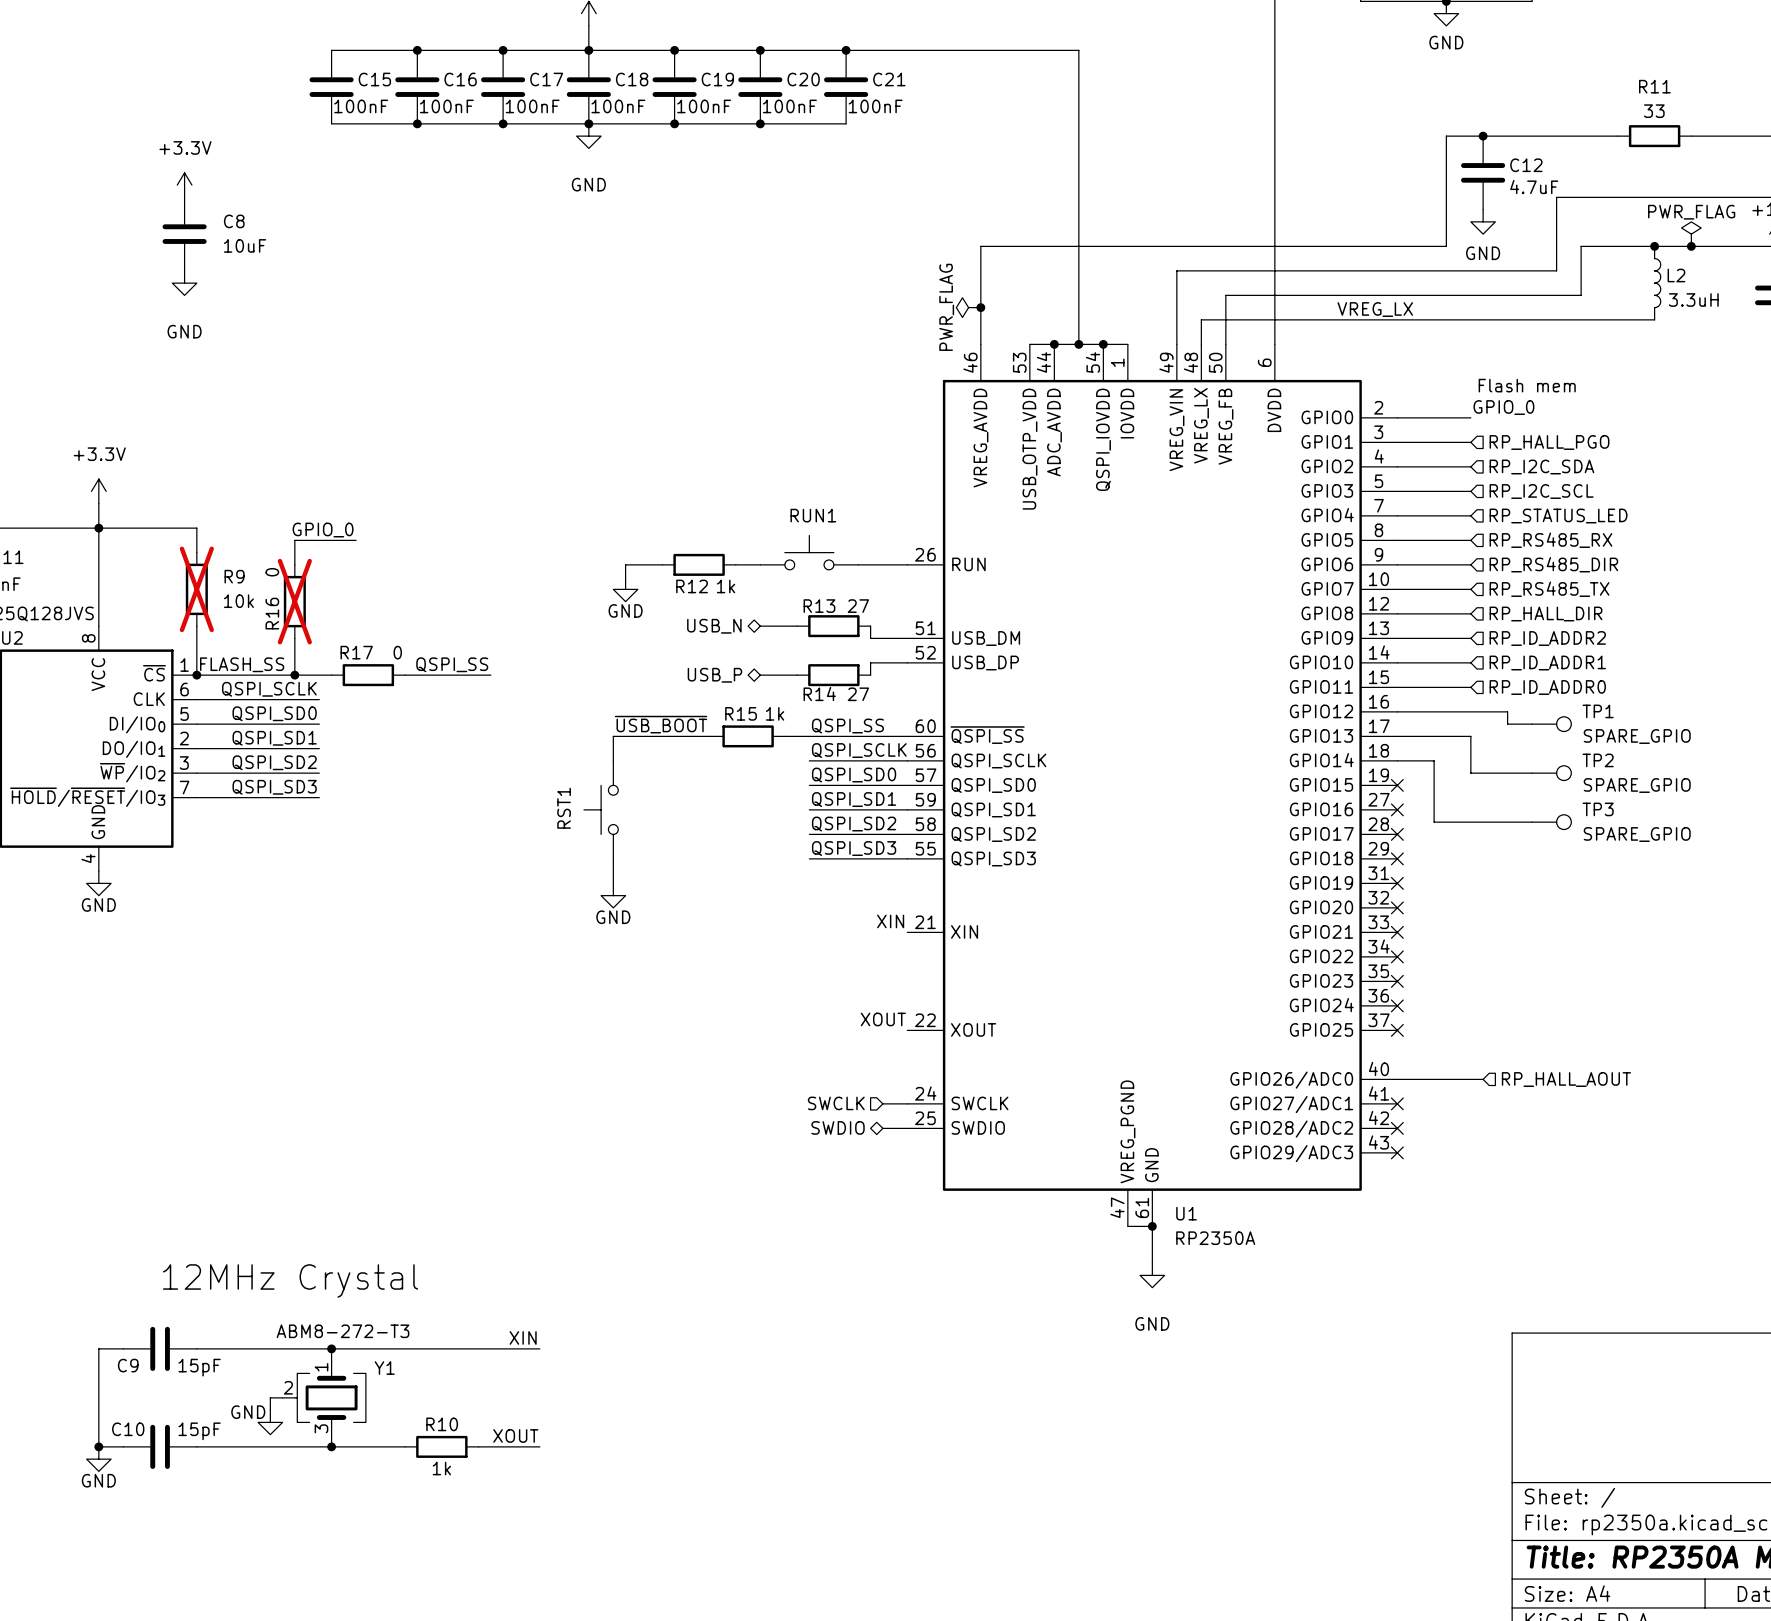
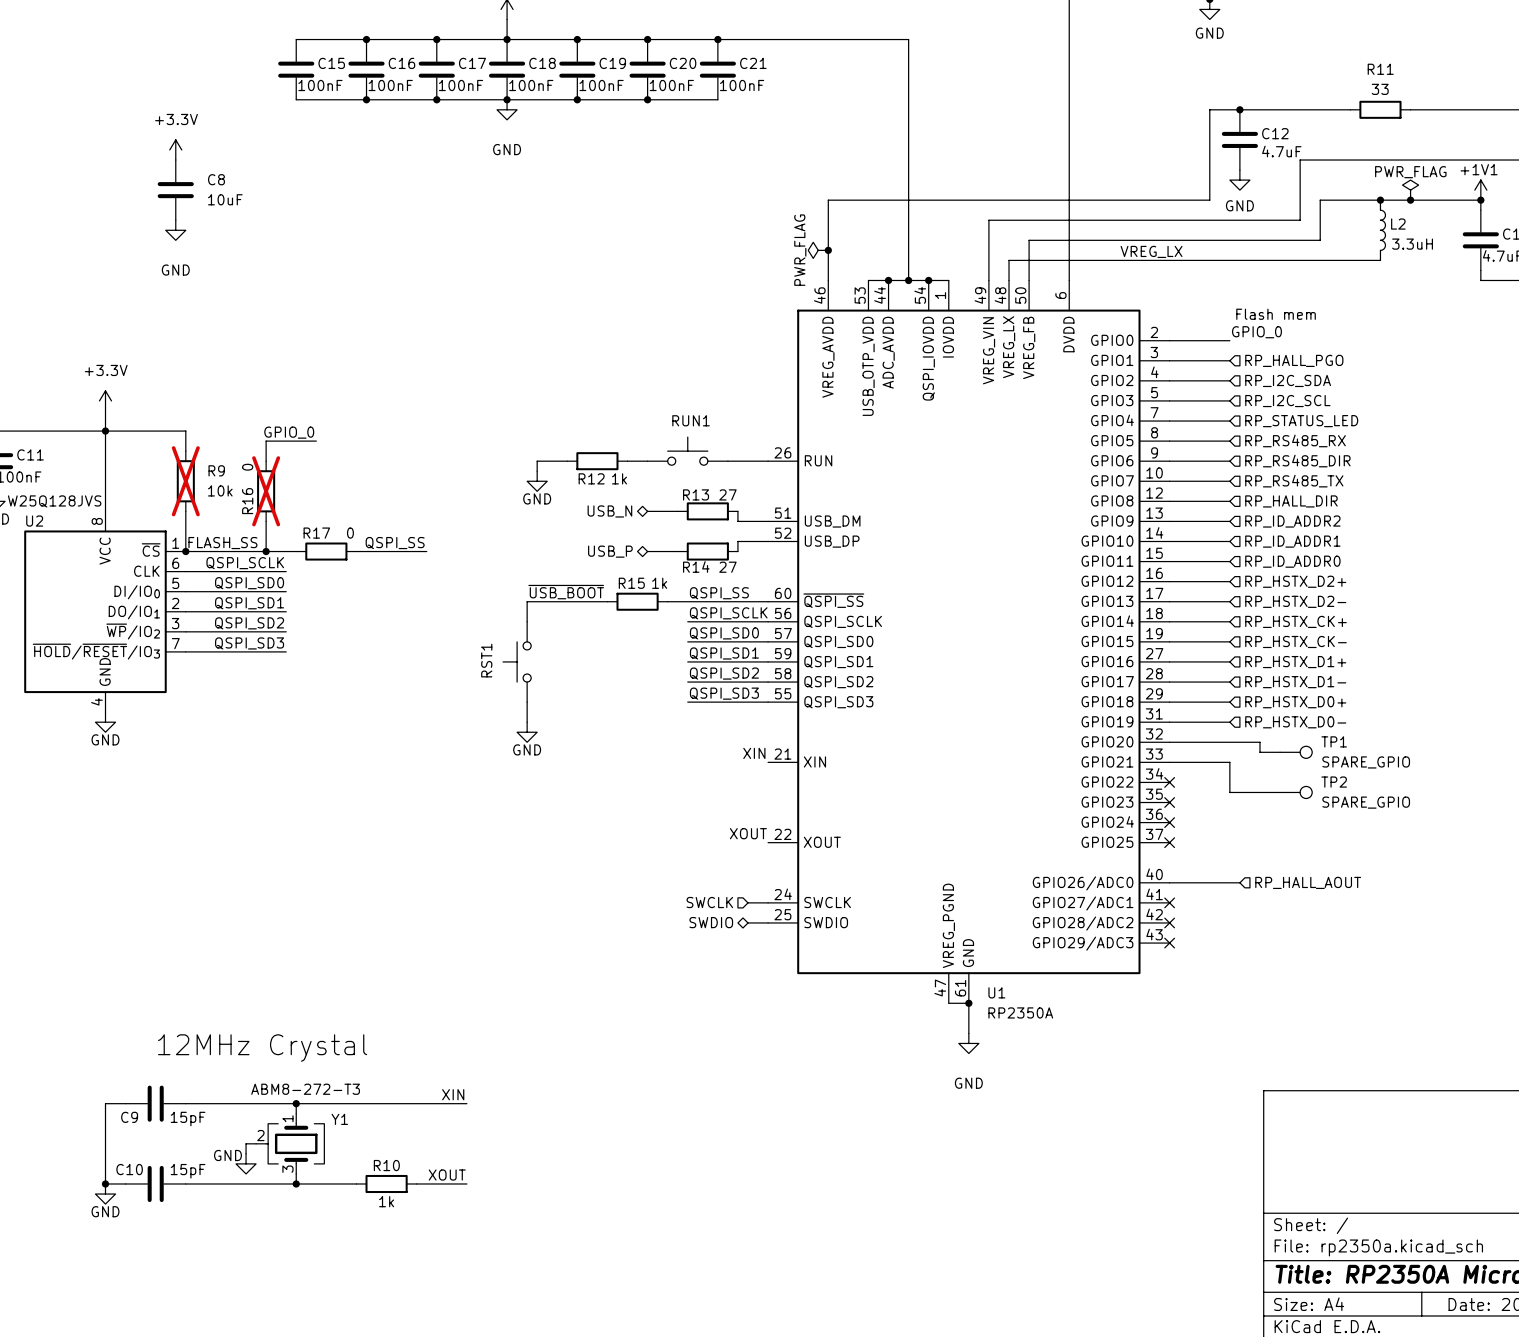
wire: (1470, 711) (1507, 711) (1507, 724) (1532, 724) -> none
hierarchical label: none -> RP_HSTX_D2+ (1295, 581)
TP1 position: (1551, 724) -> (1296, 752)
wire: (1470, 736) (1470, 773) (1532, 773) -> none
hierarchical label: none -> RP_HSTX_D2- (1295, 601)
wire: (1434, 760) (1434, 822) (1532, 822) -> (1199, 621) (1229, 621)
hierarchical label: none -> RP_HSTX_CK+ (1295, 621)
TP2 position: (1551, 773) -> (1296, 792)
wire: none -> (1169, 641) (1229, 641)
no-connect mark: (1397, 785) -> none
hierarchical label: none -> RP_HSTX_CK- (1295, 641)
wire: none -> (1169, 661) (1229, 661)
no-connect mark: (1397, 809) -> none
hierarchical label: none -> RP_HSTX_D1+ (1295, 662)
TP3: SPARE_GPIO (1551, 822) -> none
wire: none -> (1169, 682) (1229, 682)
no-connect mark: (1397, 834) -> none
hierarchical label: none -> RP_HSTX_D1- (1295, 682)
wire: none -> (1169, 702) (1229, 702)
no-connect mark: (1397, 858) -> none
hierarchical label: none -> RP_HSTX_D0+ (1295, 702)
wire: none -> (1169, 722) (1229, 722)
no-connect mark: (1397, 883) -> none
hierarchical label: none -> RP_HSTX_D0- (1295, 722)
wire: none -> (1169, 742) (1259, 742) (1259, 752) (1280, 752)
no-connect mark: (1397, 907) -> none
wire: none -> (1169, 762) (1229, 762) (1229, 792) (1280, 792)
no-connect mark: (1397, 932) -> none

